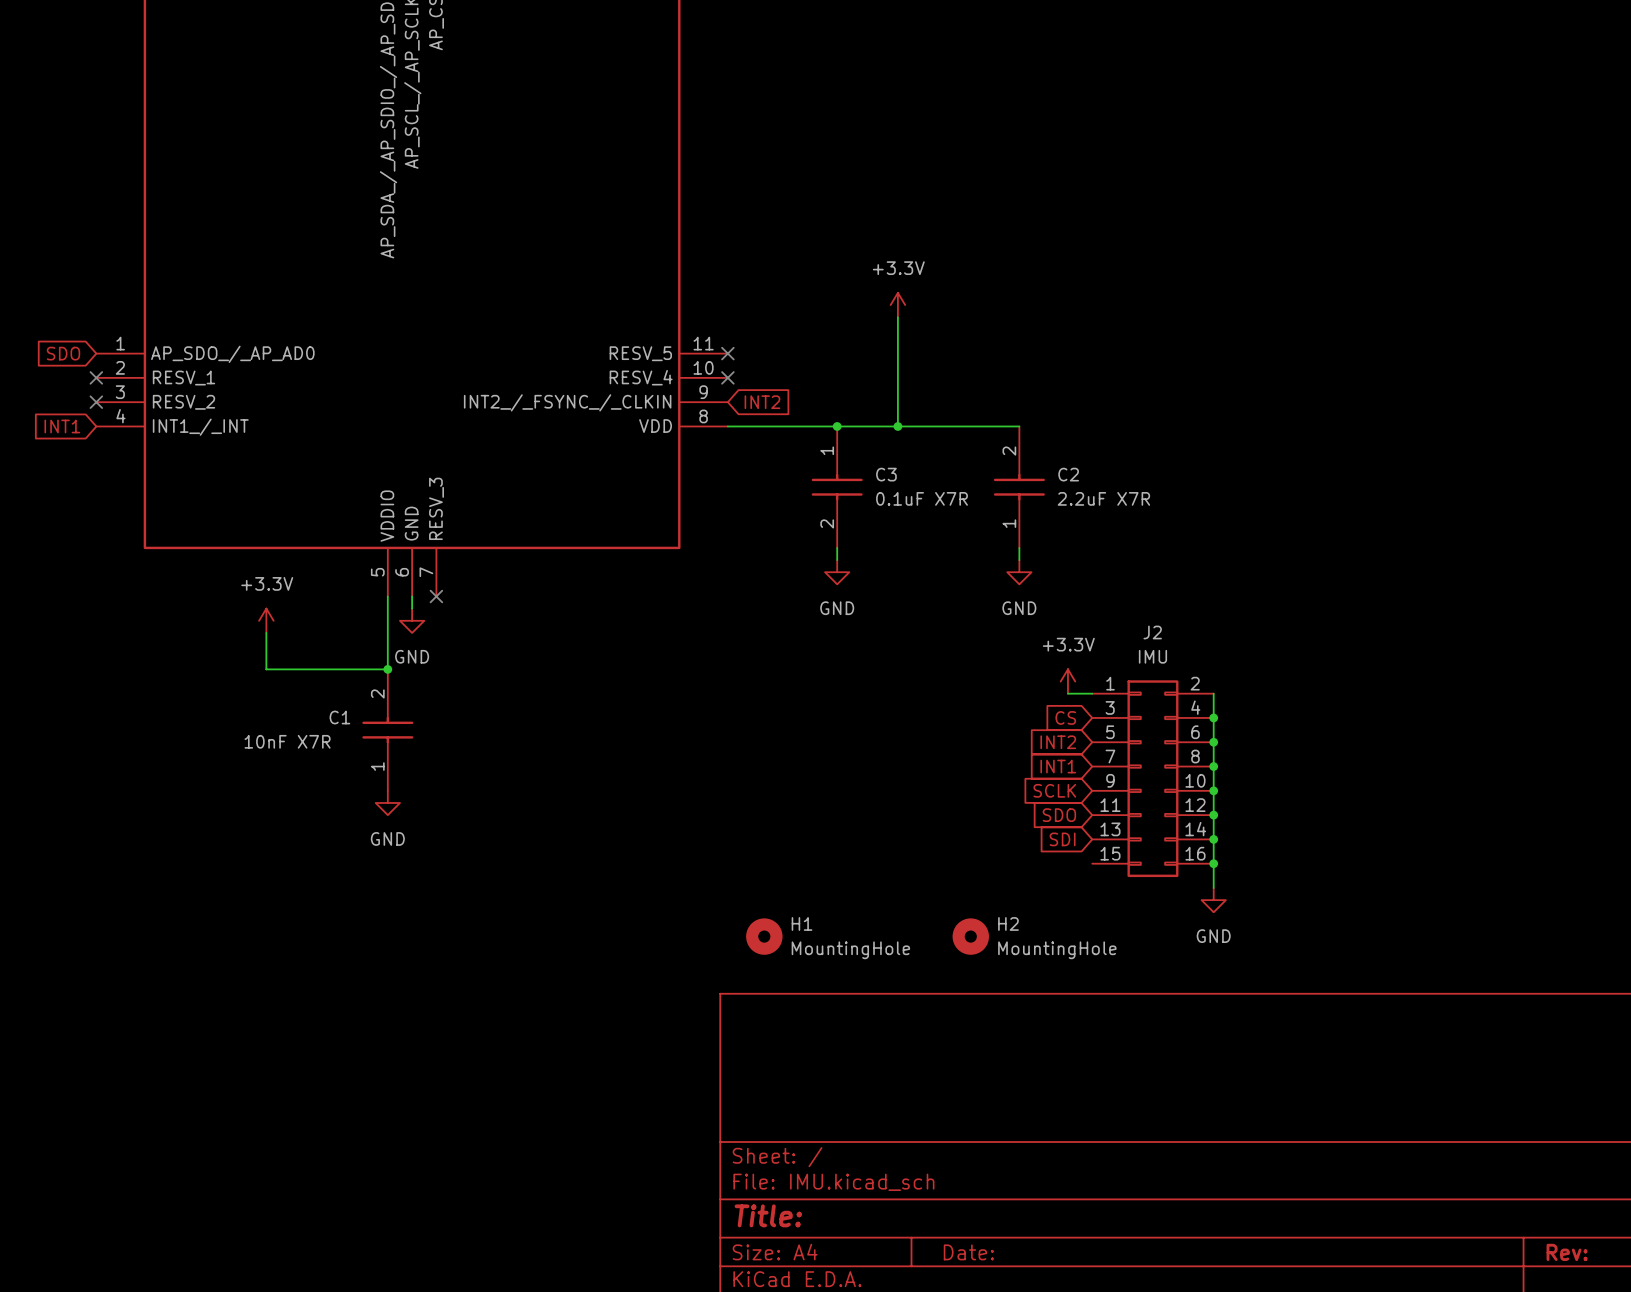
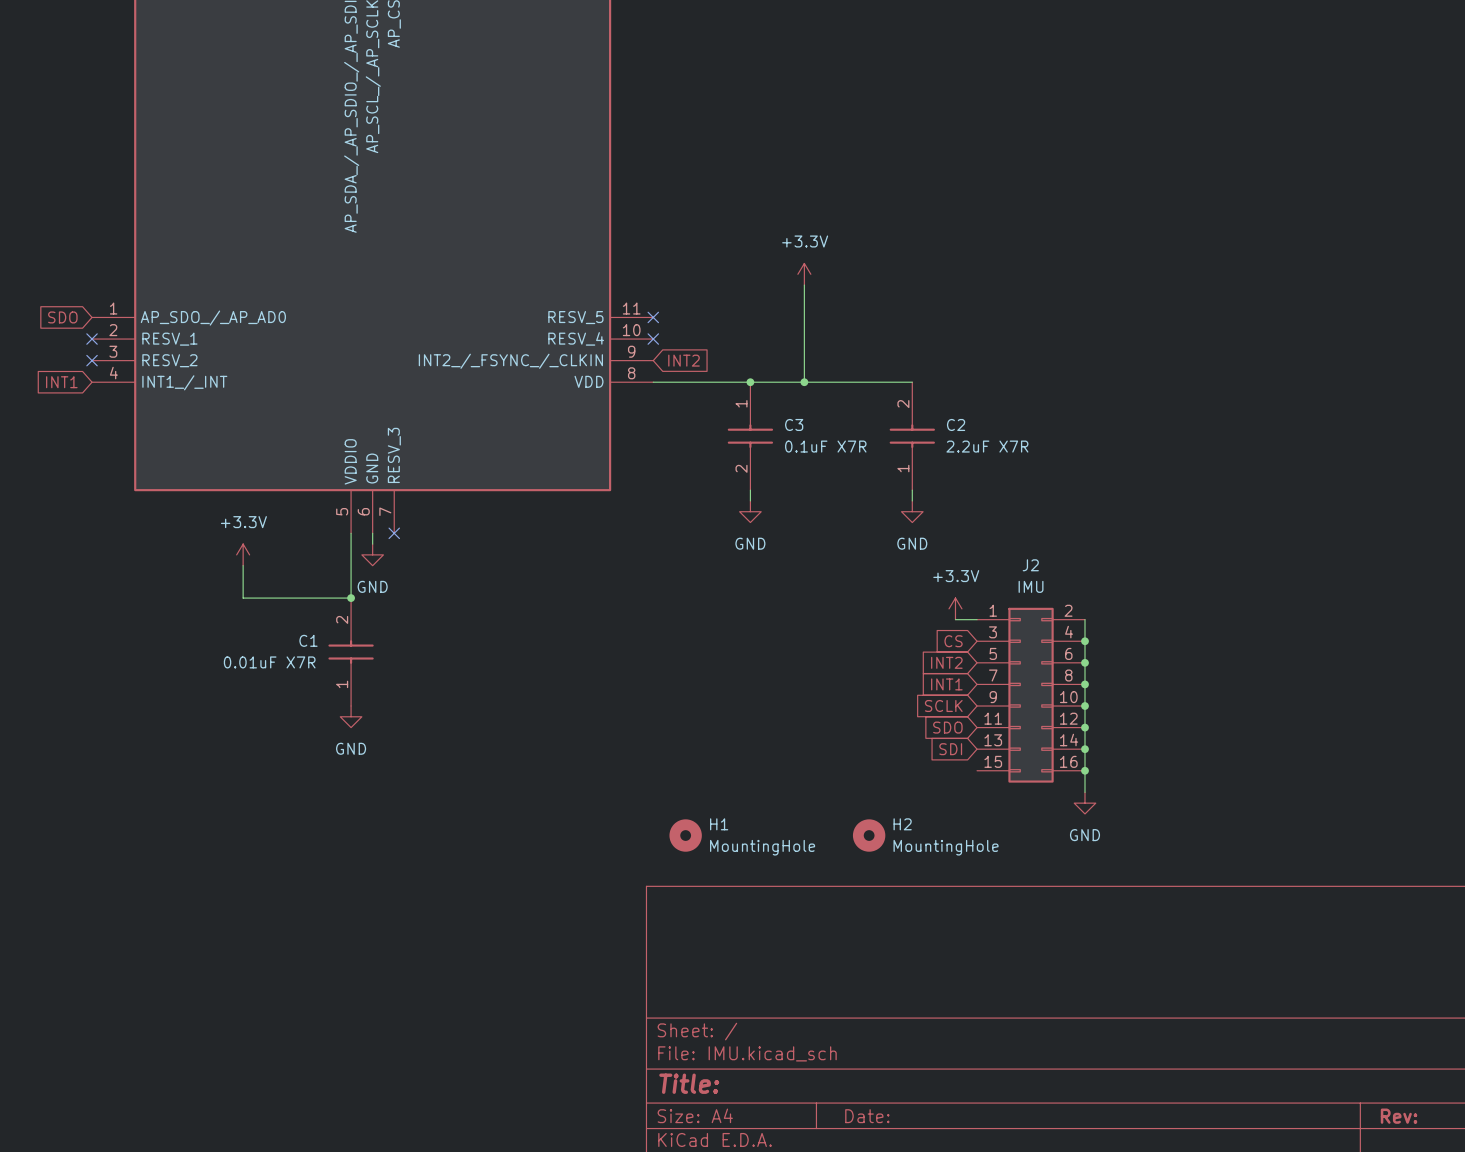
C1 value: 10nF X7R (287, 741) -> 0.01uF X7R (269, 662)

